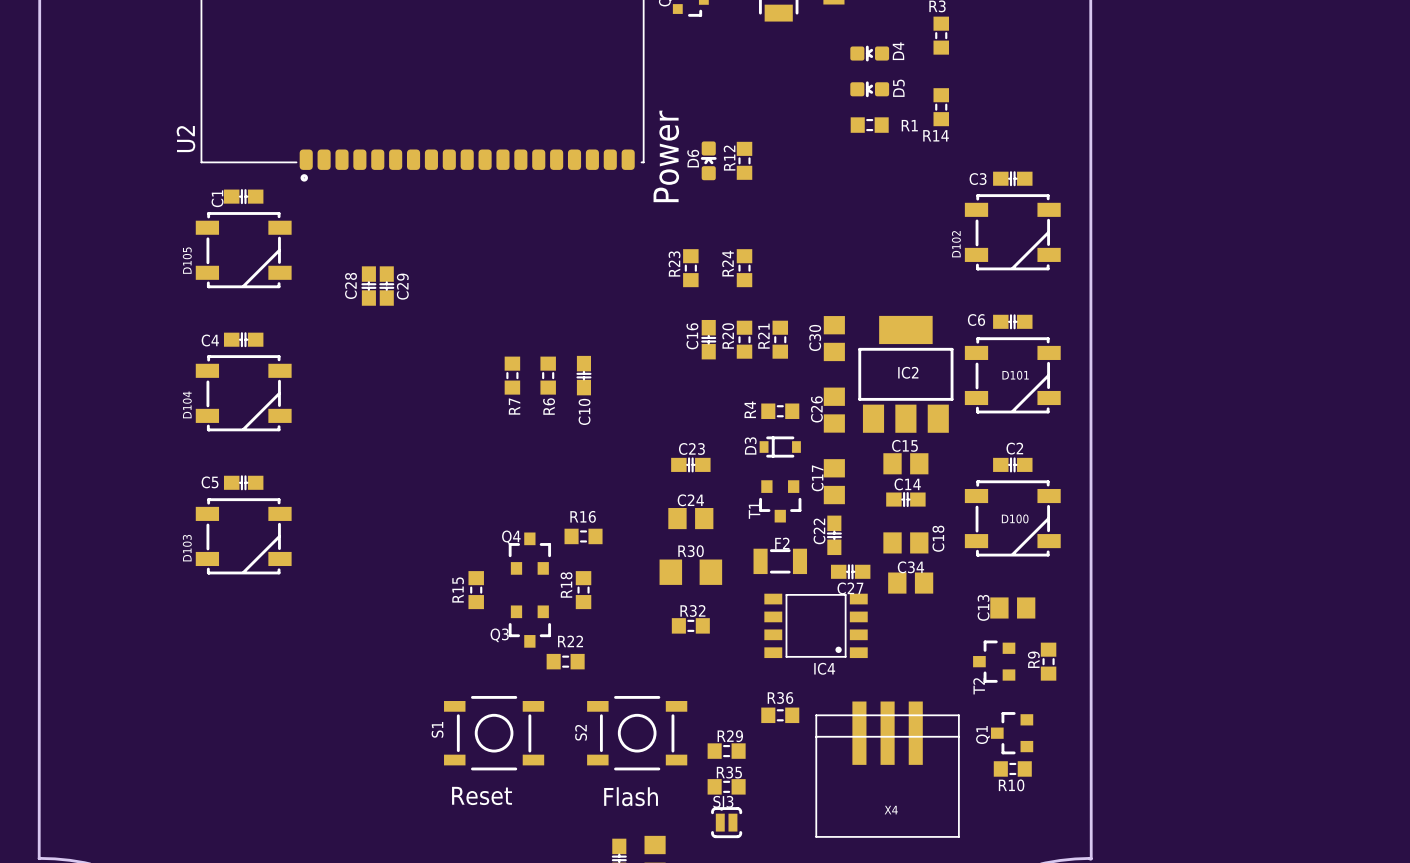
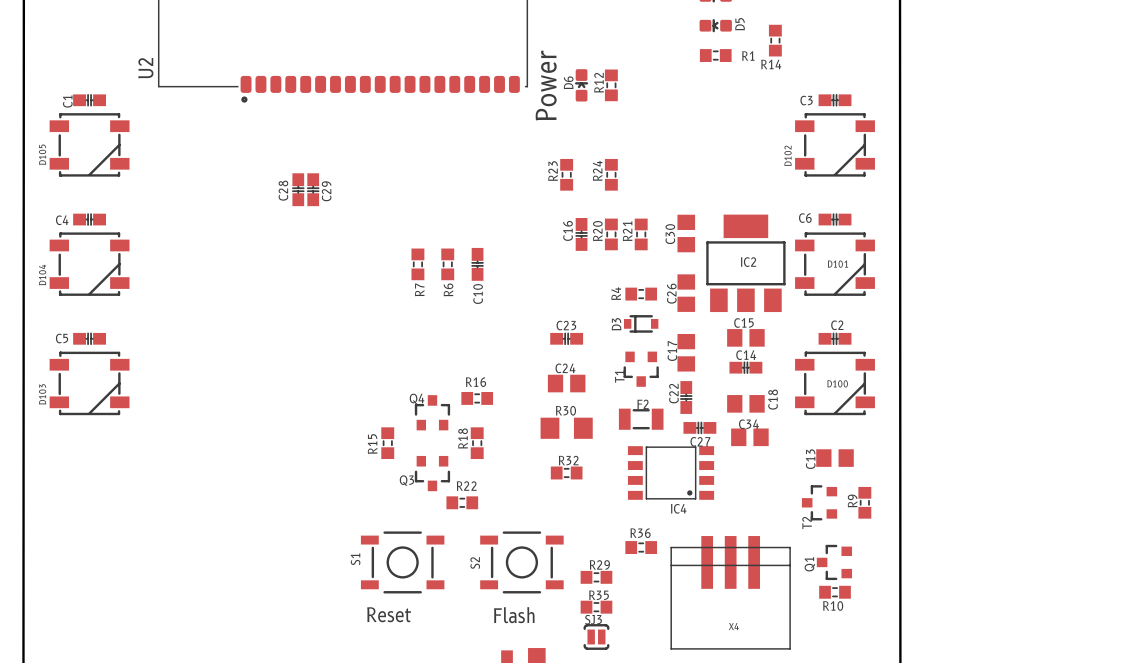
C1 position: (243, 196) -> (89, 100)
D105 position: (243, 250) -> (89, 144)
C4 position: (243, 339) -> (89, 219)
D104 position: (243, 393) -> (89, 264)
C5 position: (243, 482) -> (89, 338)
D103 position: (243, 536) -> (89, 383)

